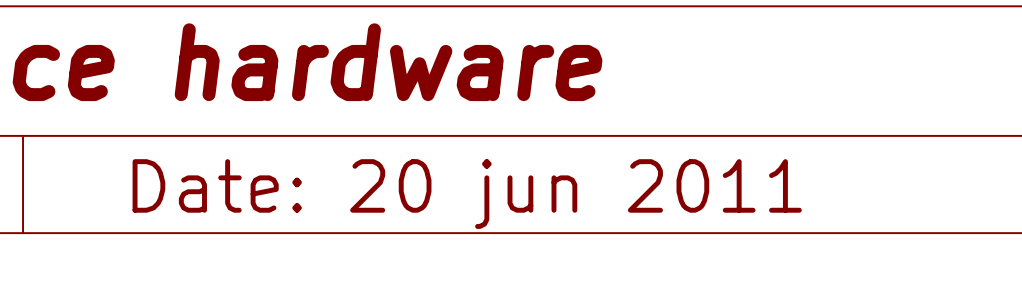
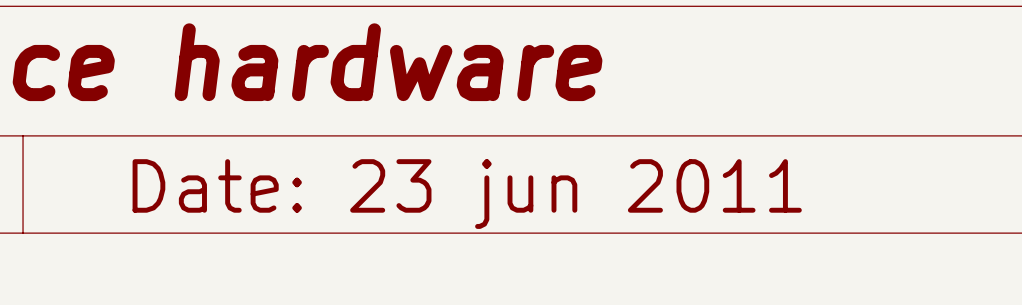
title block: Date: 20 jun 2011 (467, 194) -> Date: 23 jun 2011 (467, 194)

